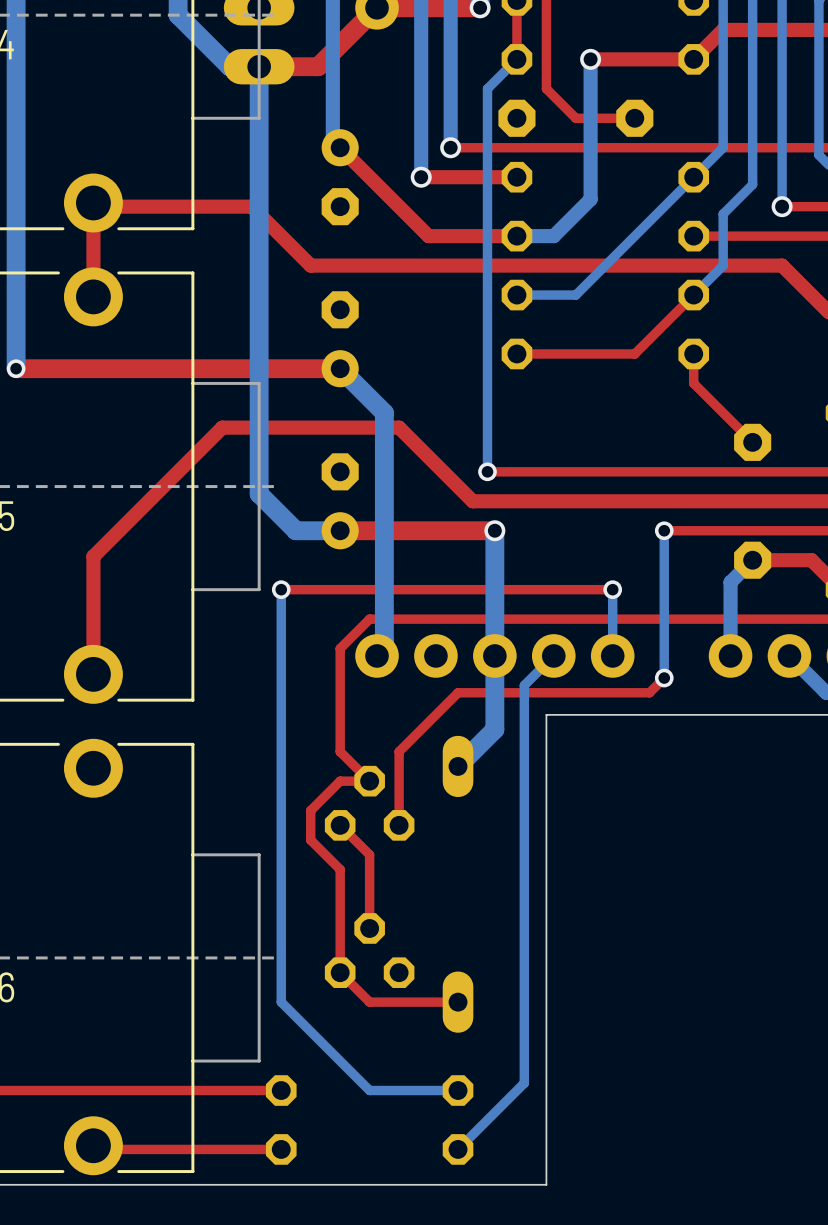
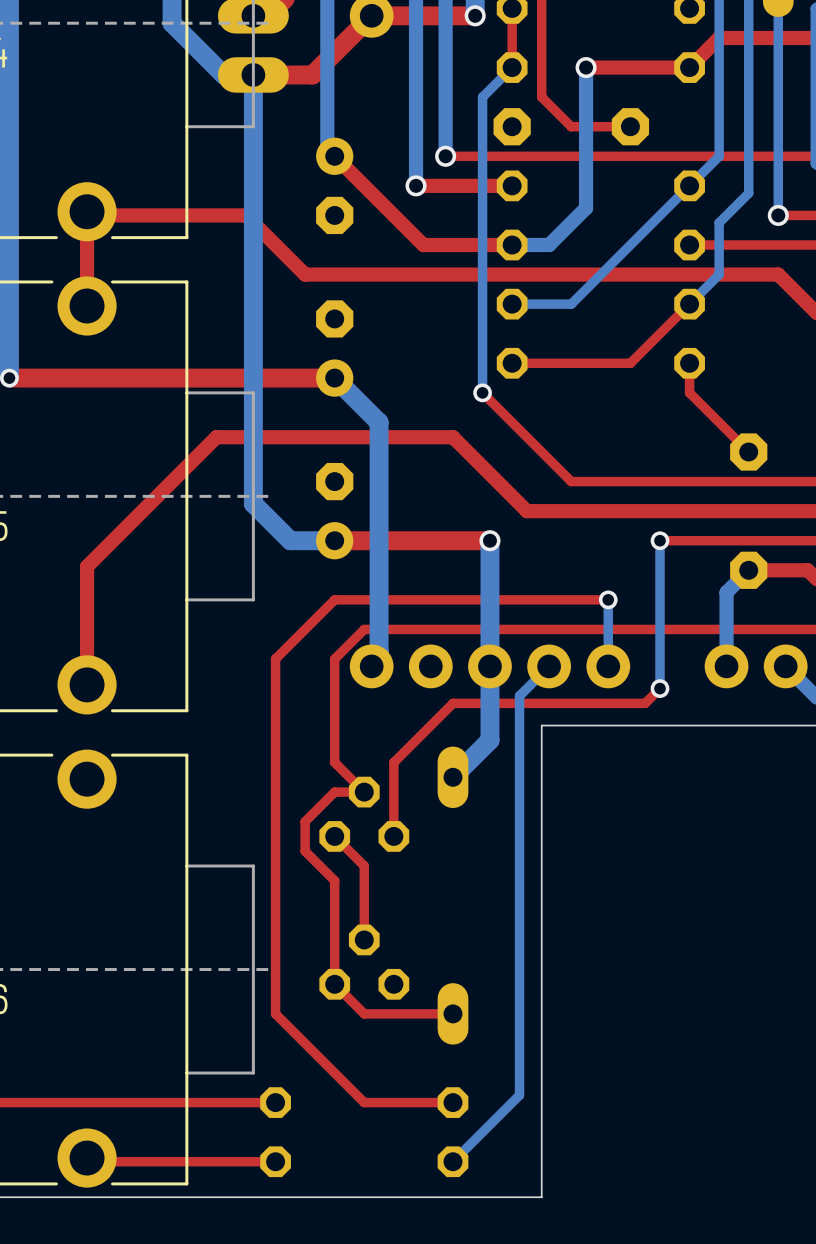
bottom track: (487, 383) (487, 471) -> none
top track: (399, 427) (472, 501) (531, 501) -> (393, 437) (453, 437) (526, 511)
via position: (487, 471) -> (482, 392)
top track: (575, 471) (487, 471) -> (571, 481) (482, 392)
bottom track: (281, 589) (281, 1002) (369, 1090) (458, 1090) -> none
via: (281, 589) -> none
top track: (340, 589) (281, 589) -> (334, 599) (275, 659) (275, 1013) (364, 1102) (453, 1102)

